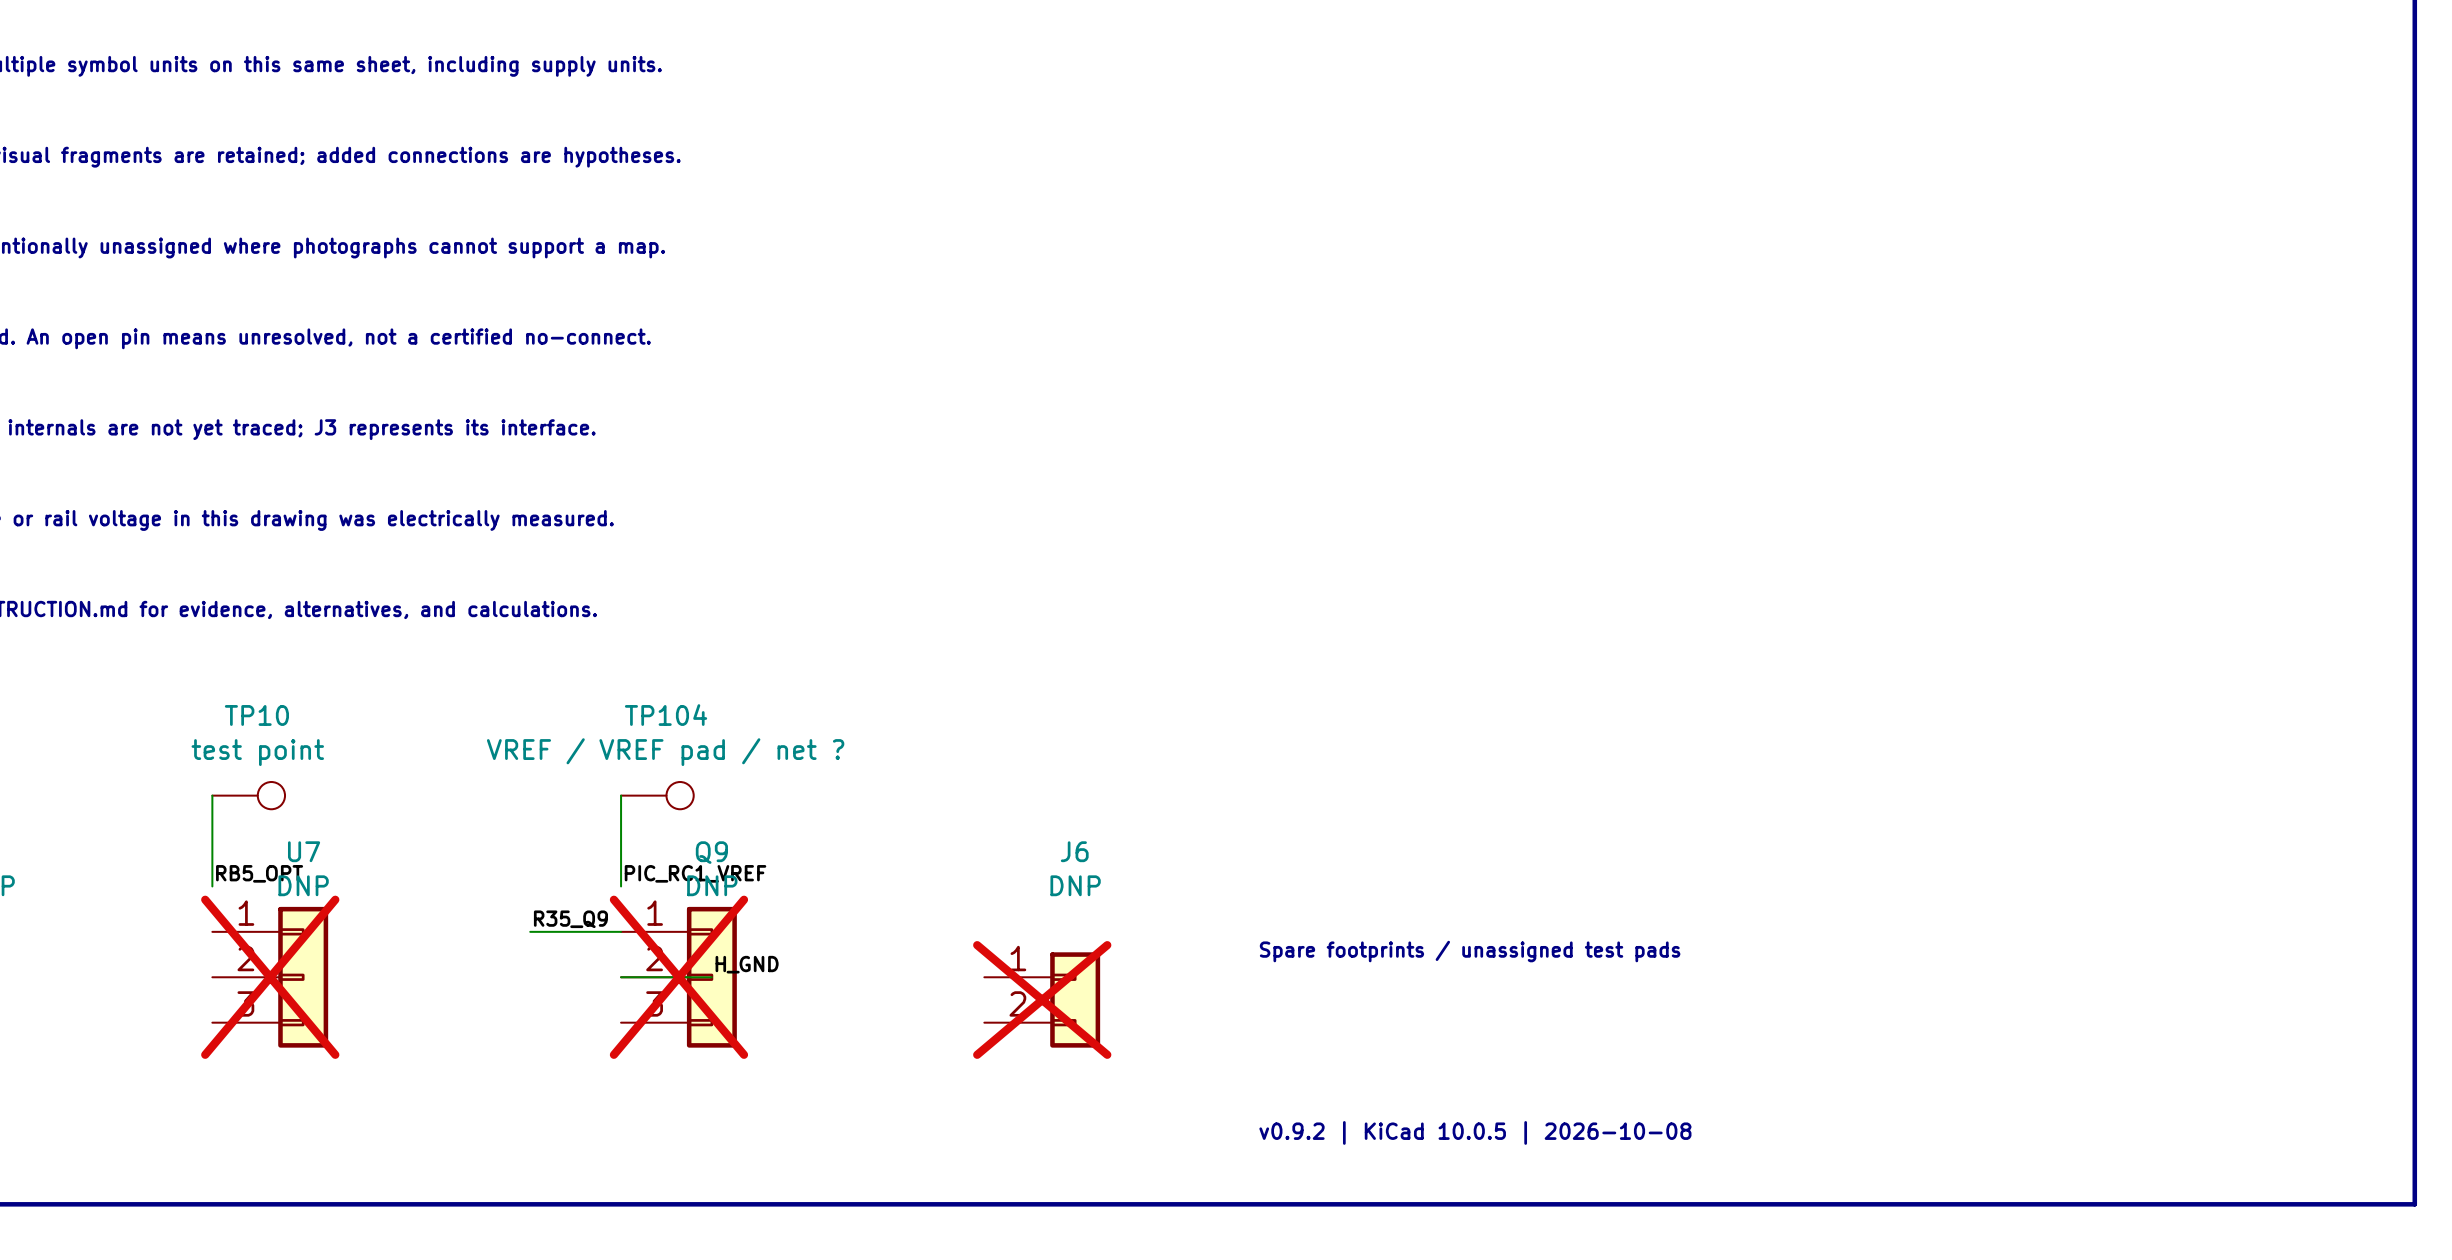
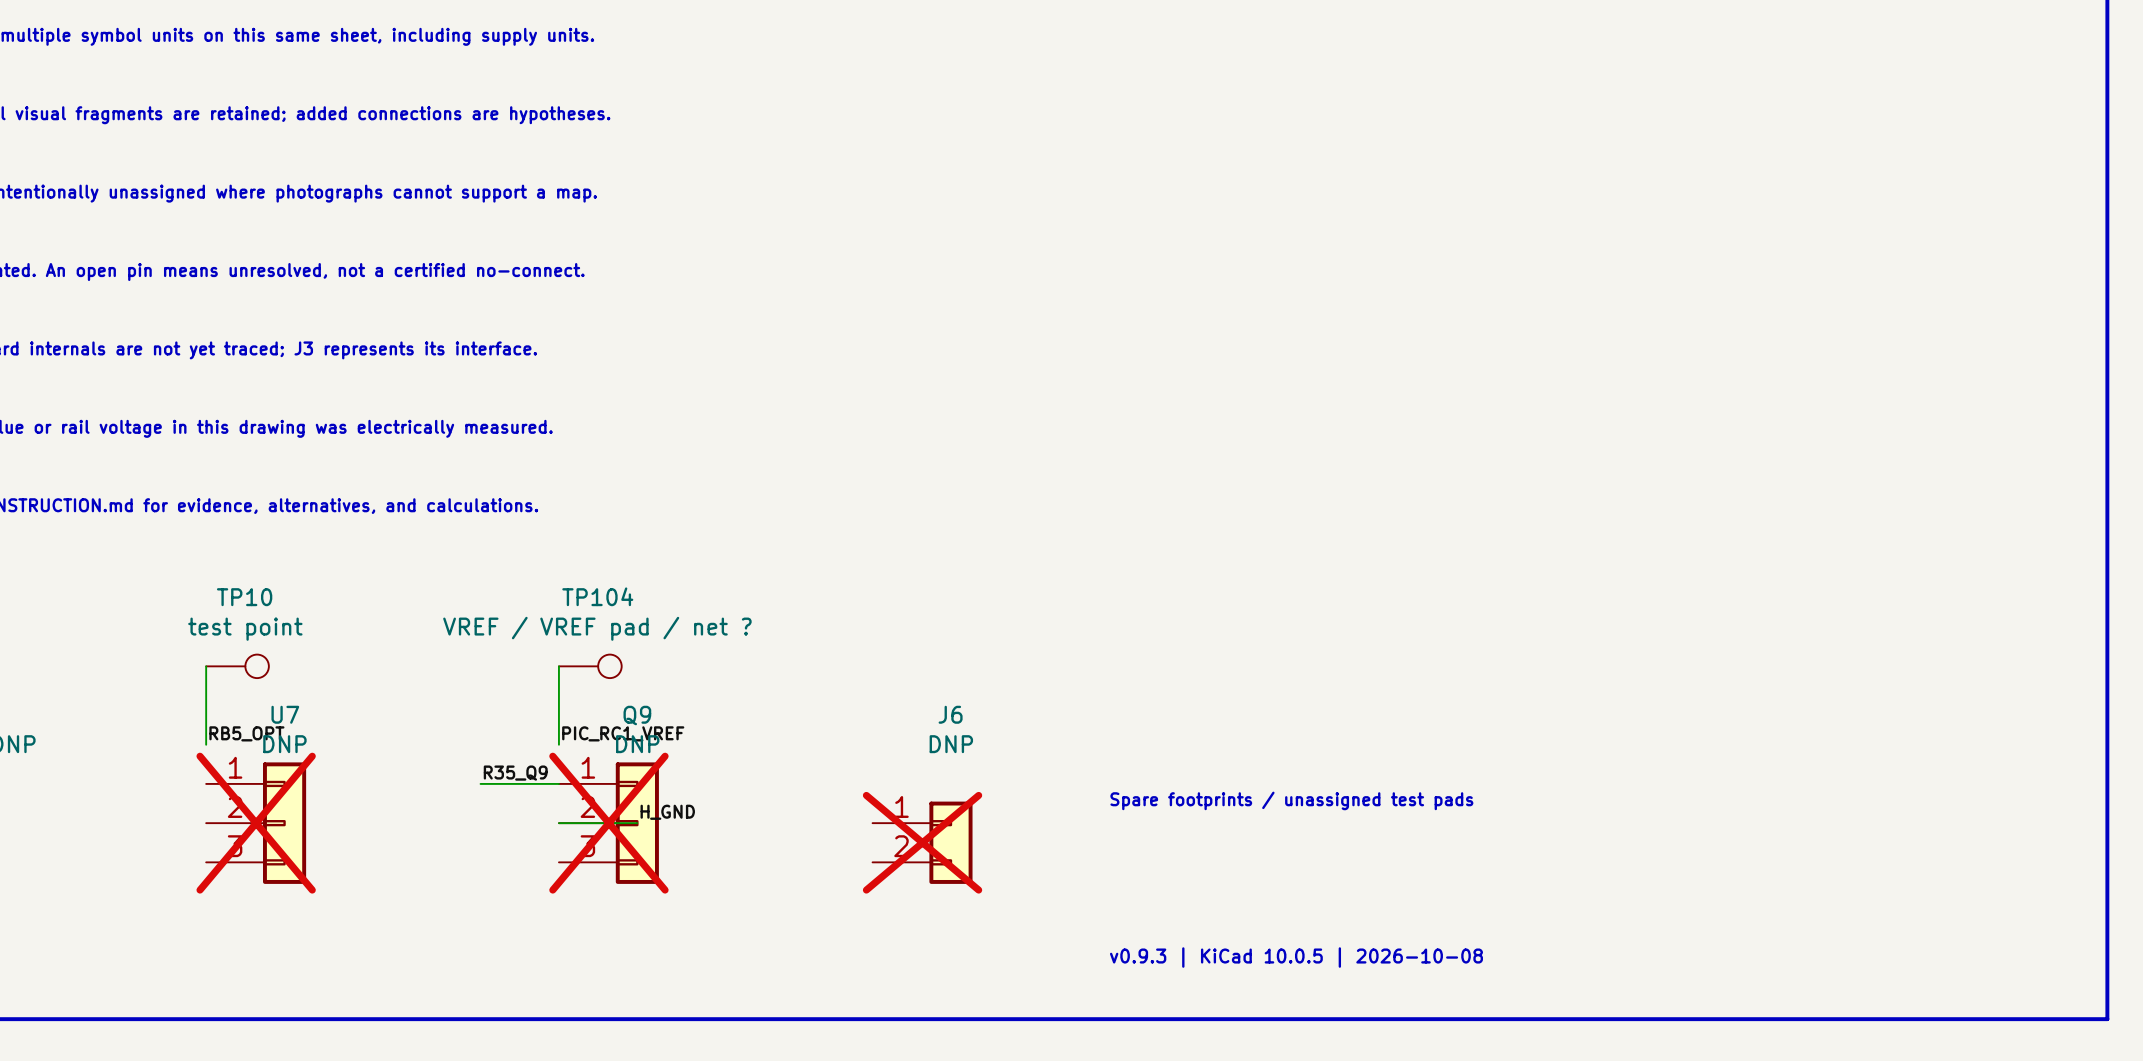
text: v0.9.2 | KiCad 10.0.5 | 2026-10-08 (1475, 1132) -> v0.9.3 | KiCad 10.0.5 | 2026-10-08 (1296, 957)

